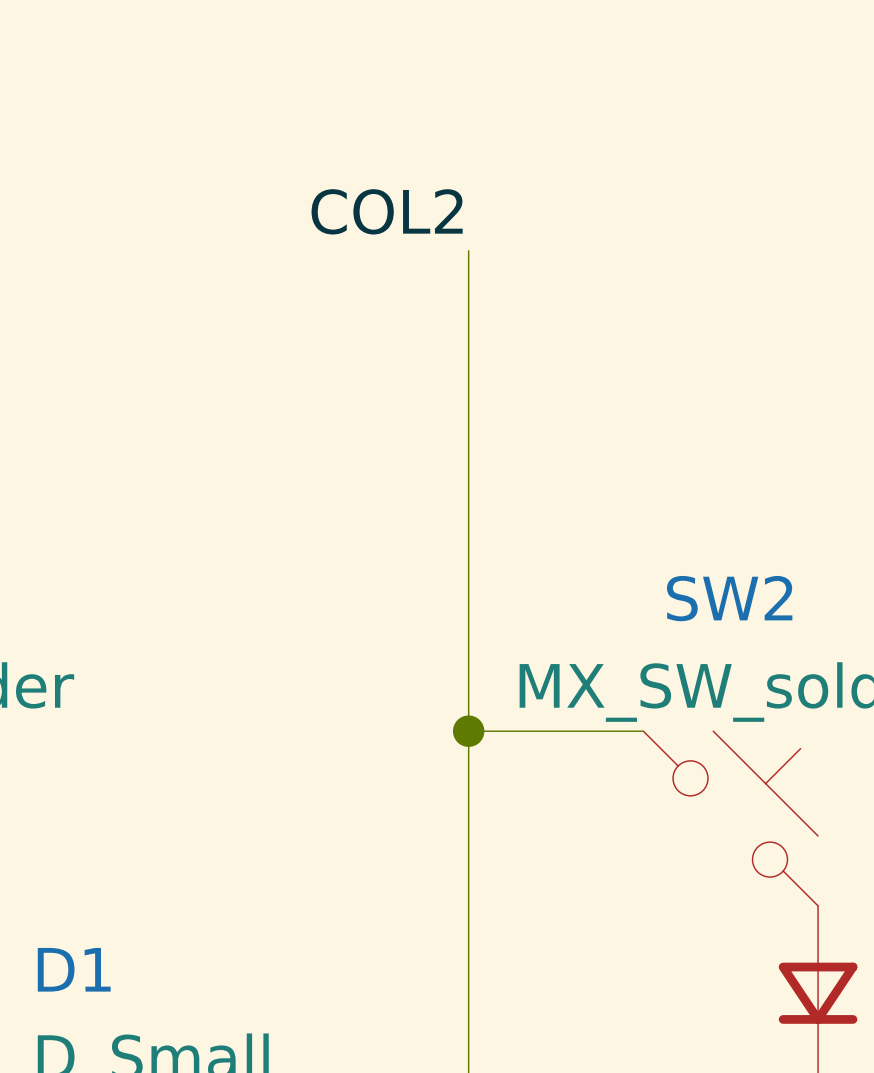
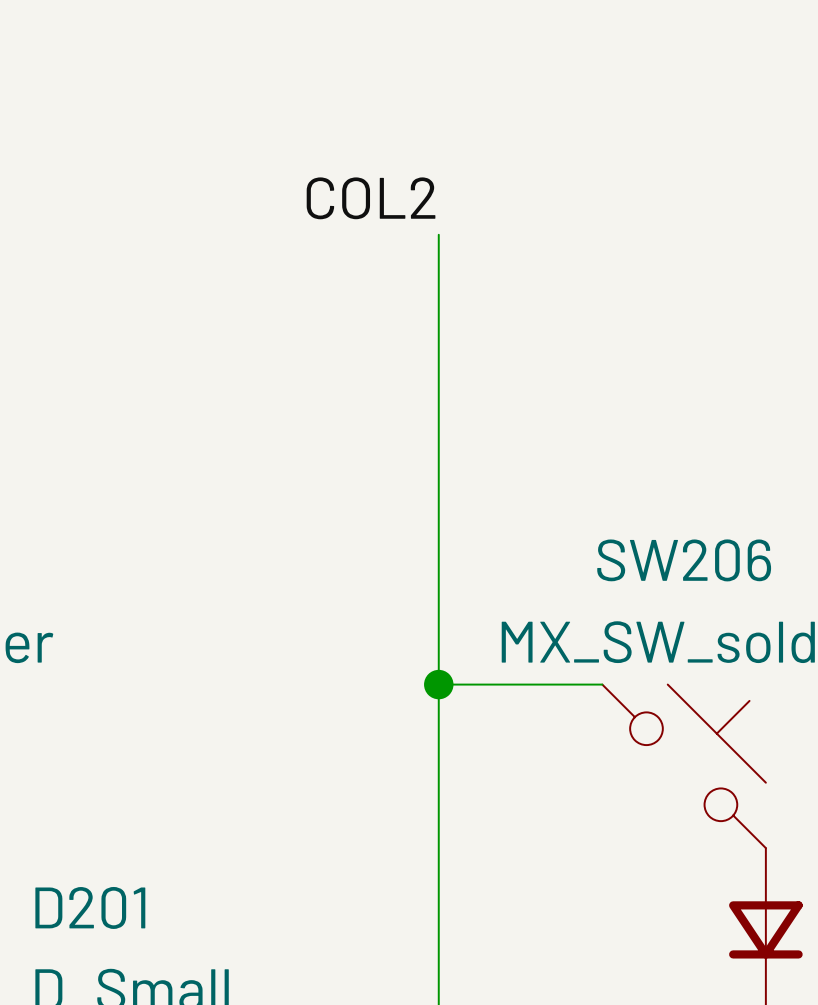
SW2 name: SW2 (729, 598) -> SW206 (684, 560)
D1 name: D1 (74, 969) -> D201 (90, 907)

